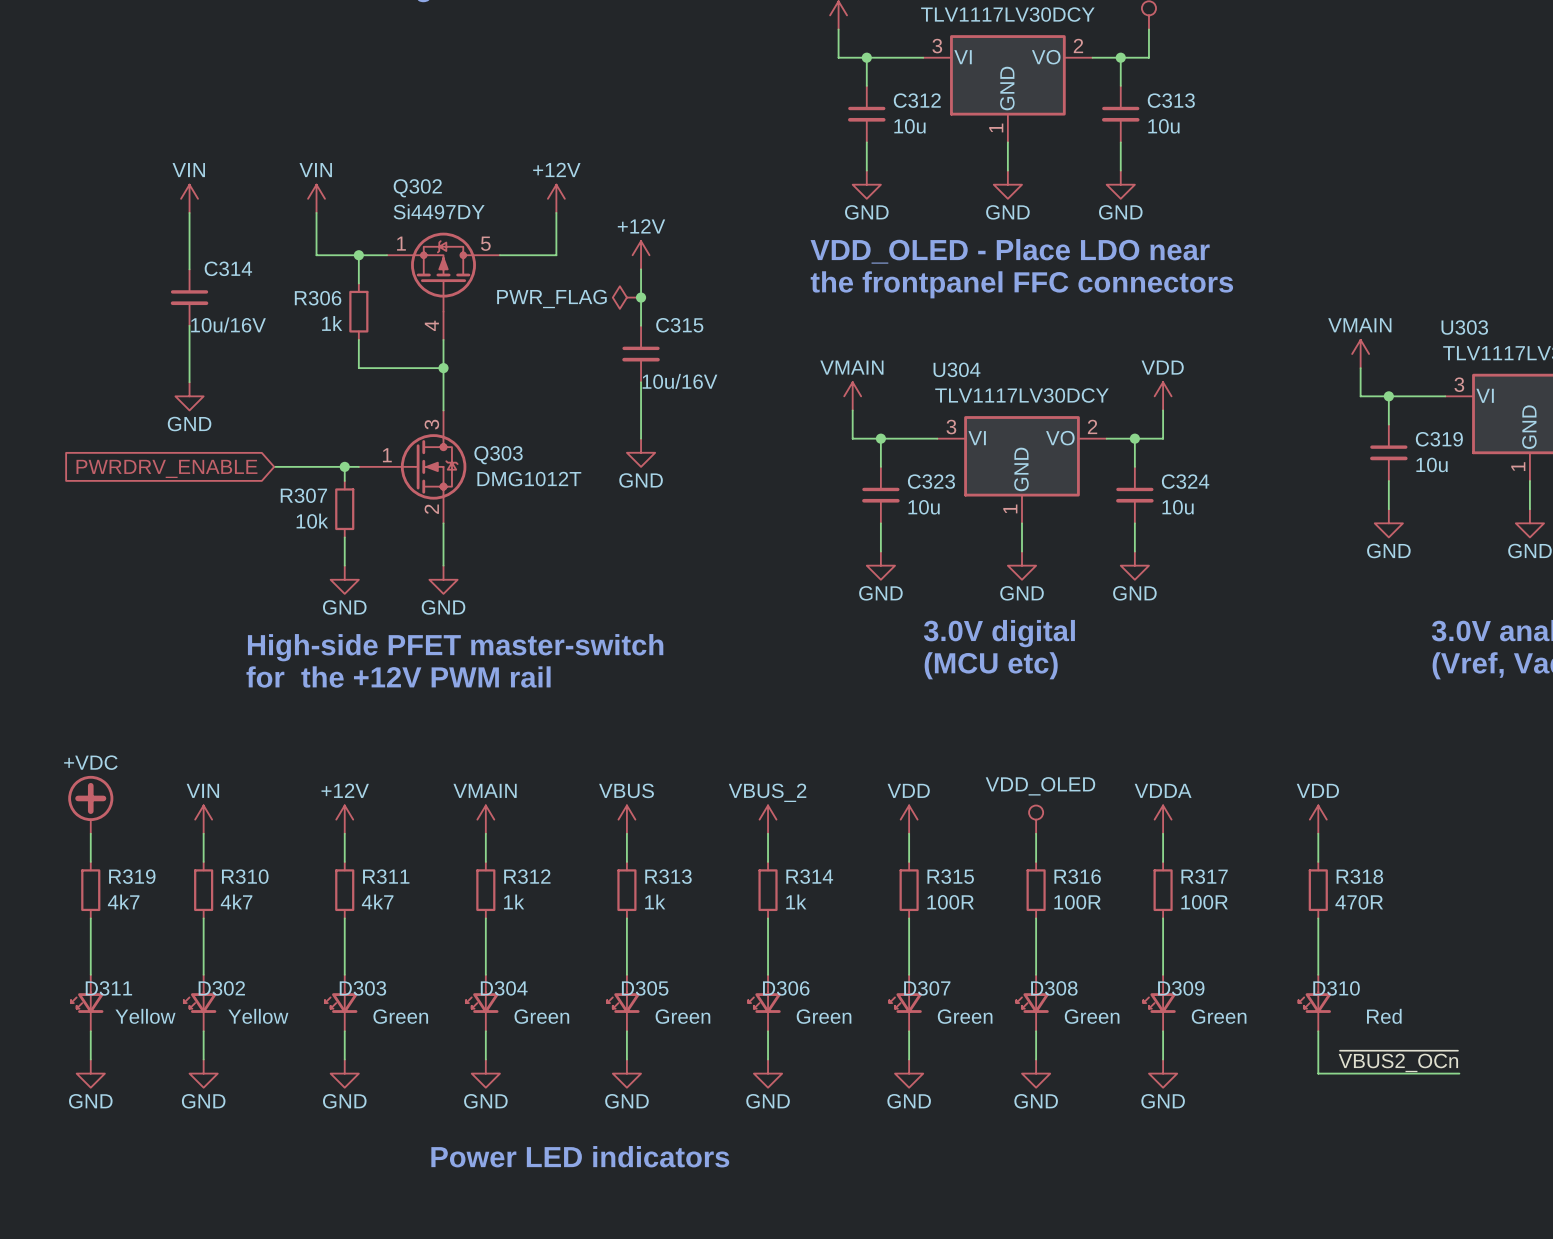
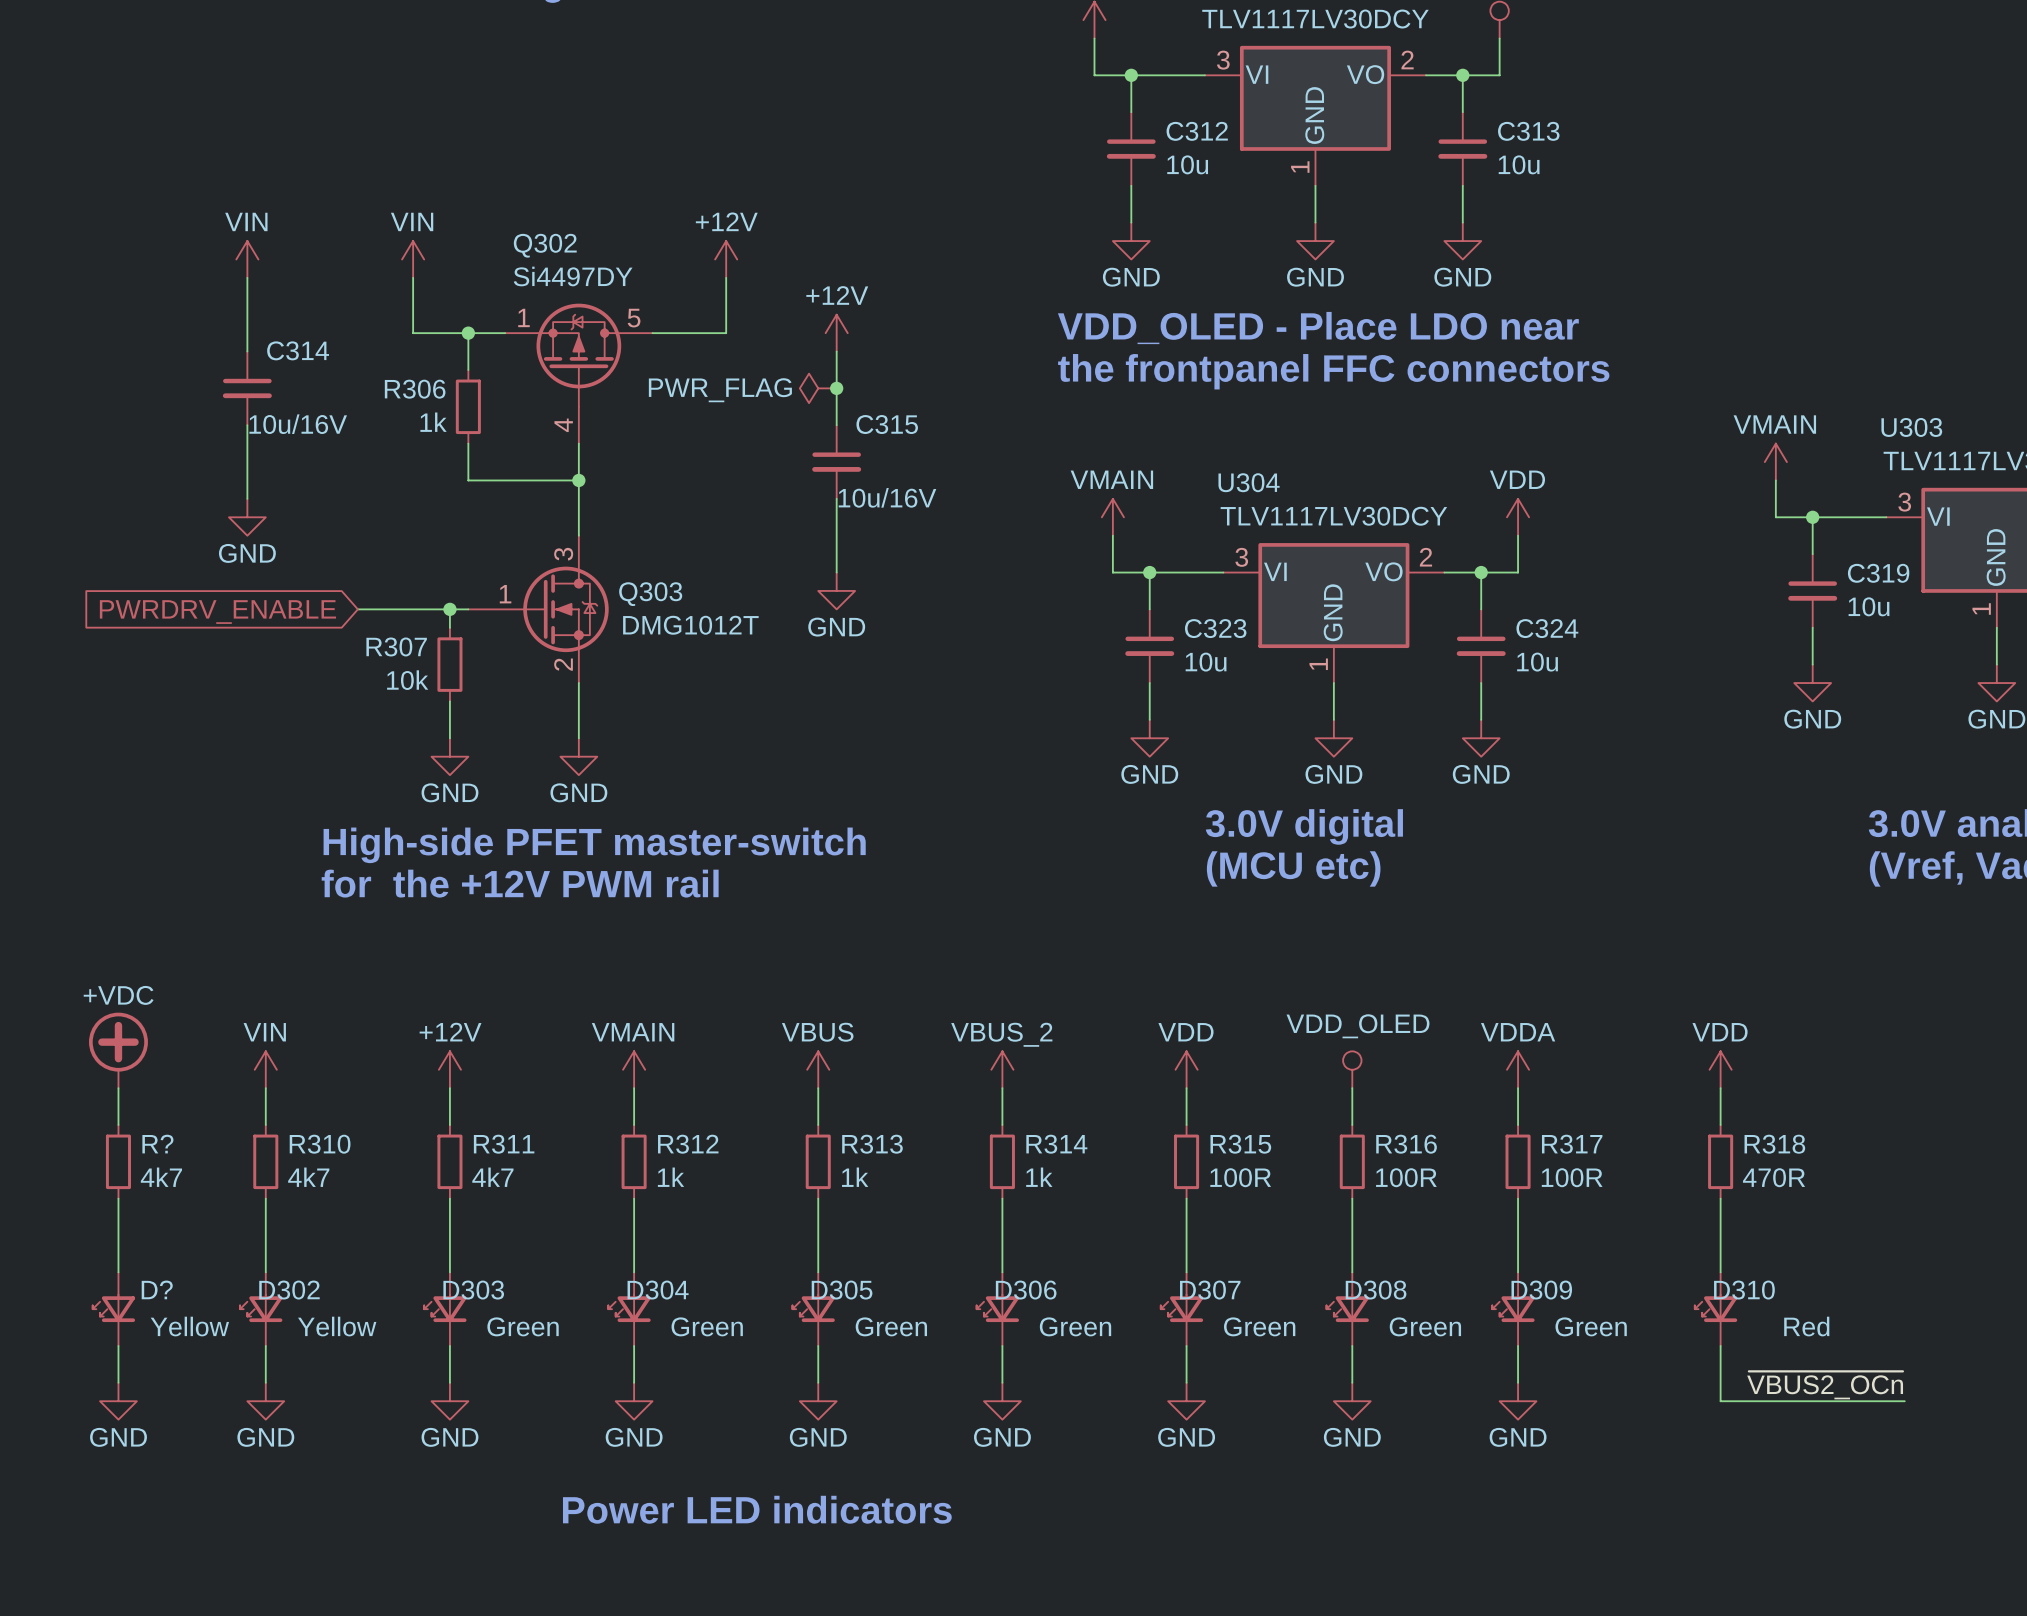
R319 name: R319 (132, 876) -> R? (157, 1144)
D311 name: D311 (108, 988) -> D? (157, 1289)

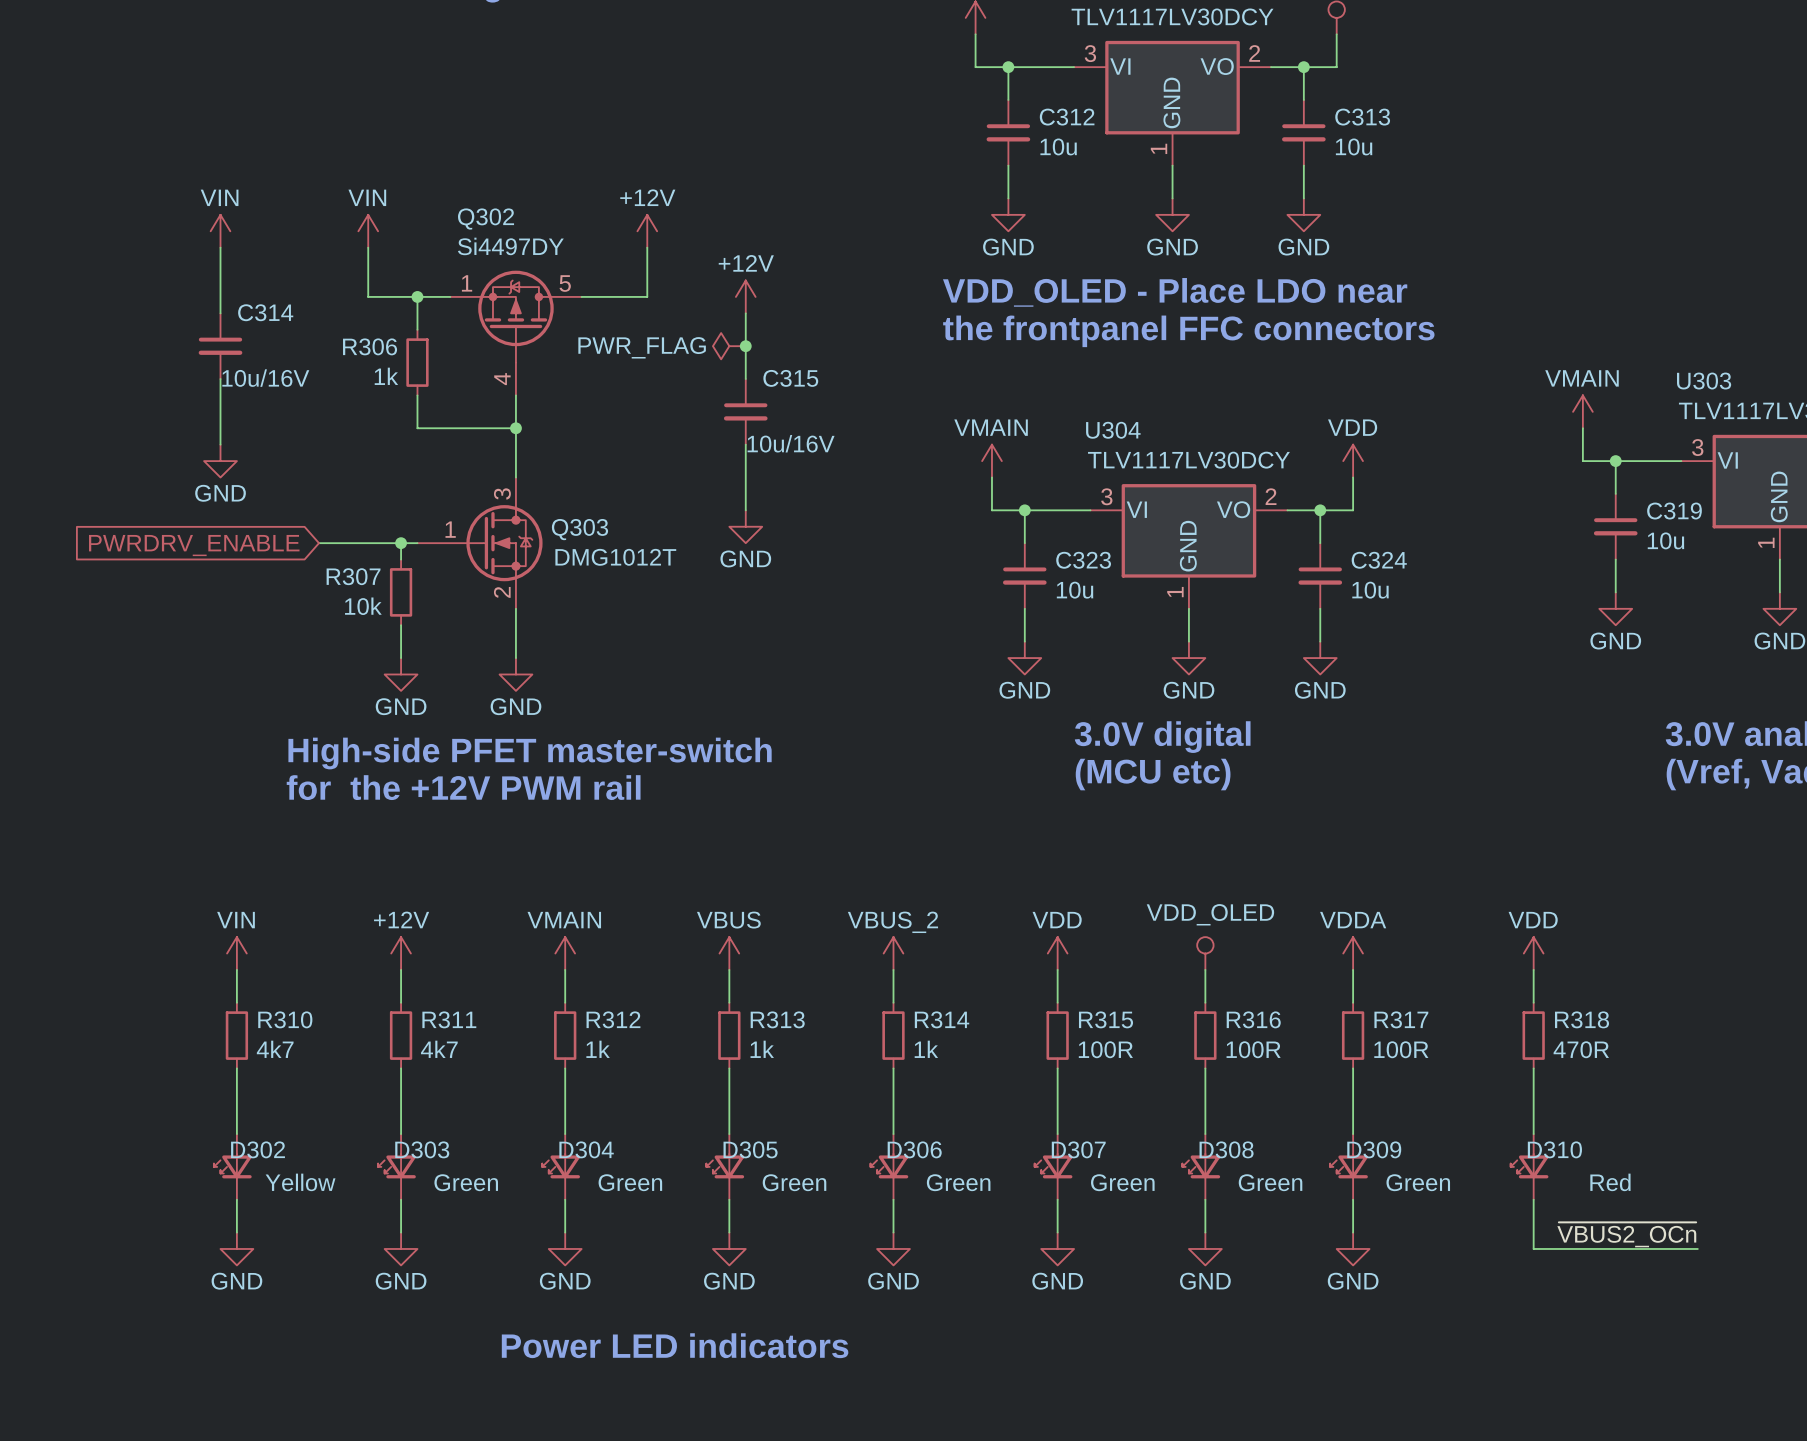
power symbol: +VDC (118, 1050) -> none
wire: (118, 1088) (118, 1125) -> none
R?: 4k7 (118, 1161) -> none
wire: (118, 1198) (118, 1272) -> none
D?: Yellow (113, 1309) -> none
wire: (118, 1345) (118, 1382) -> none
power symbol: GND (118, 1401) -> none

